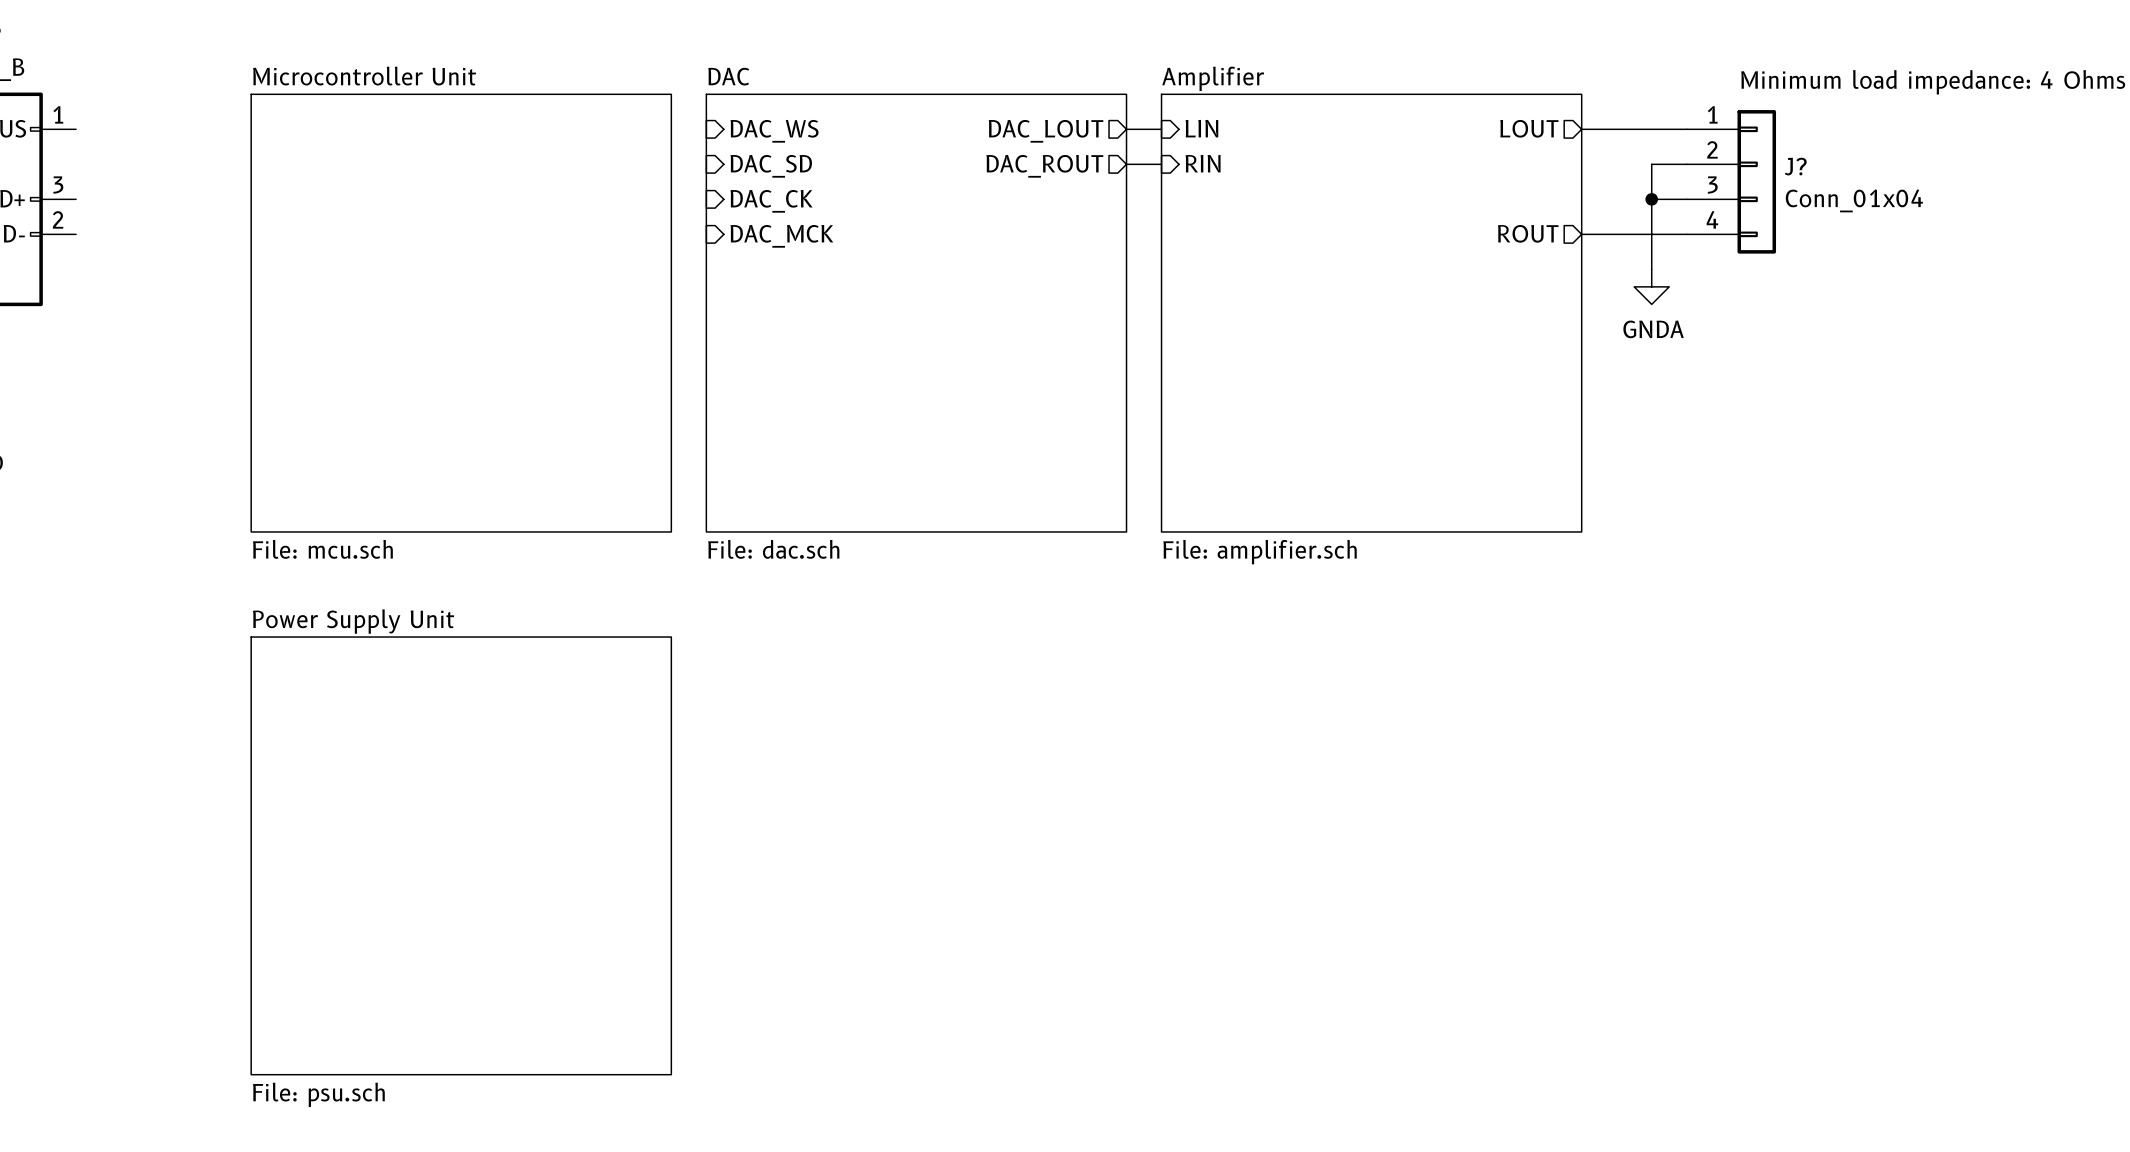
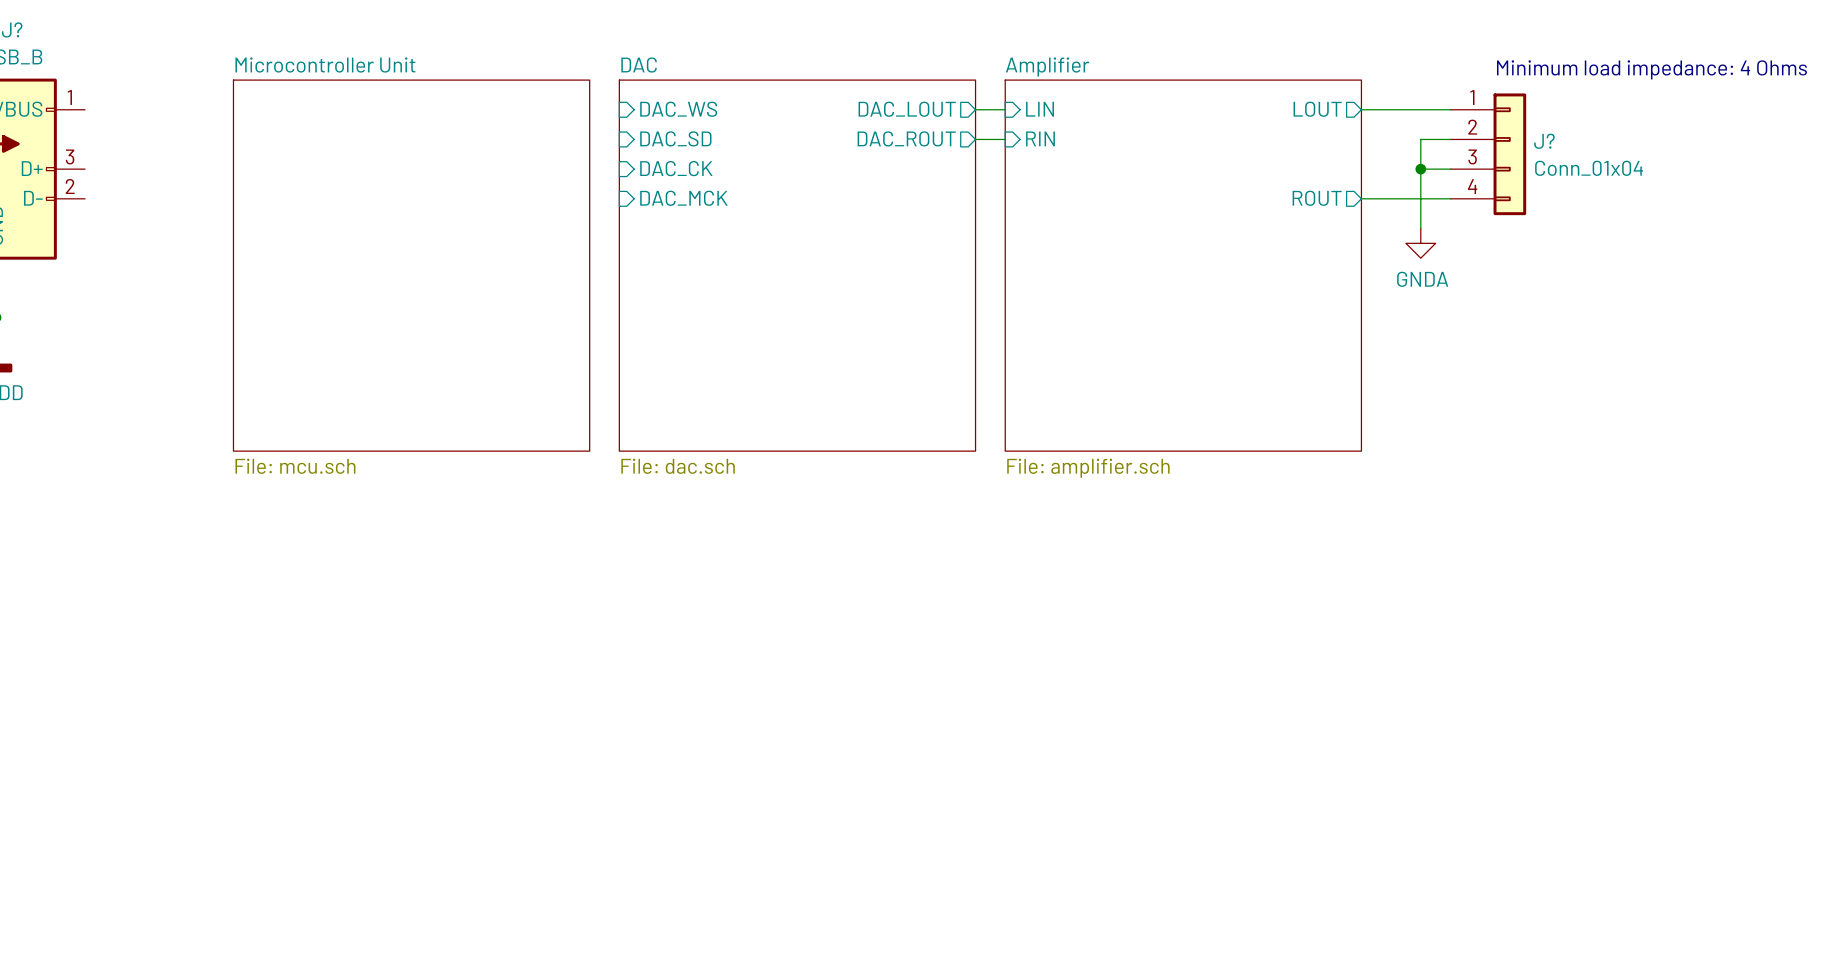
sheet Power Supply Unit: File: psu.sch (461, 855) -> none

